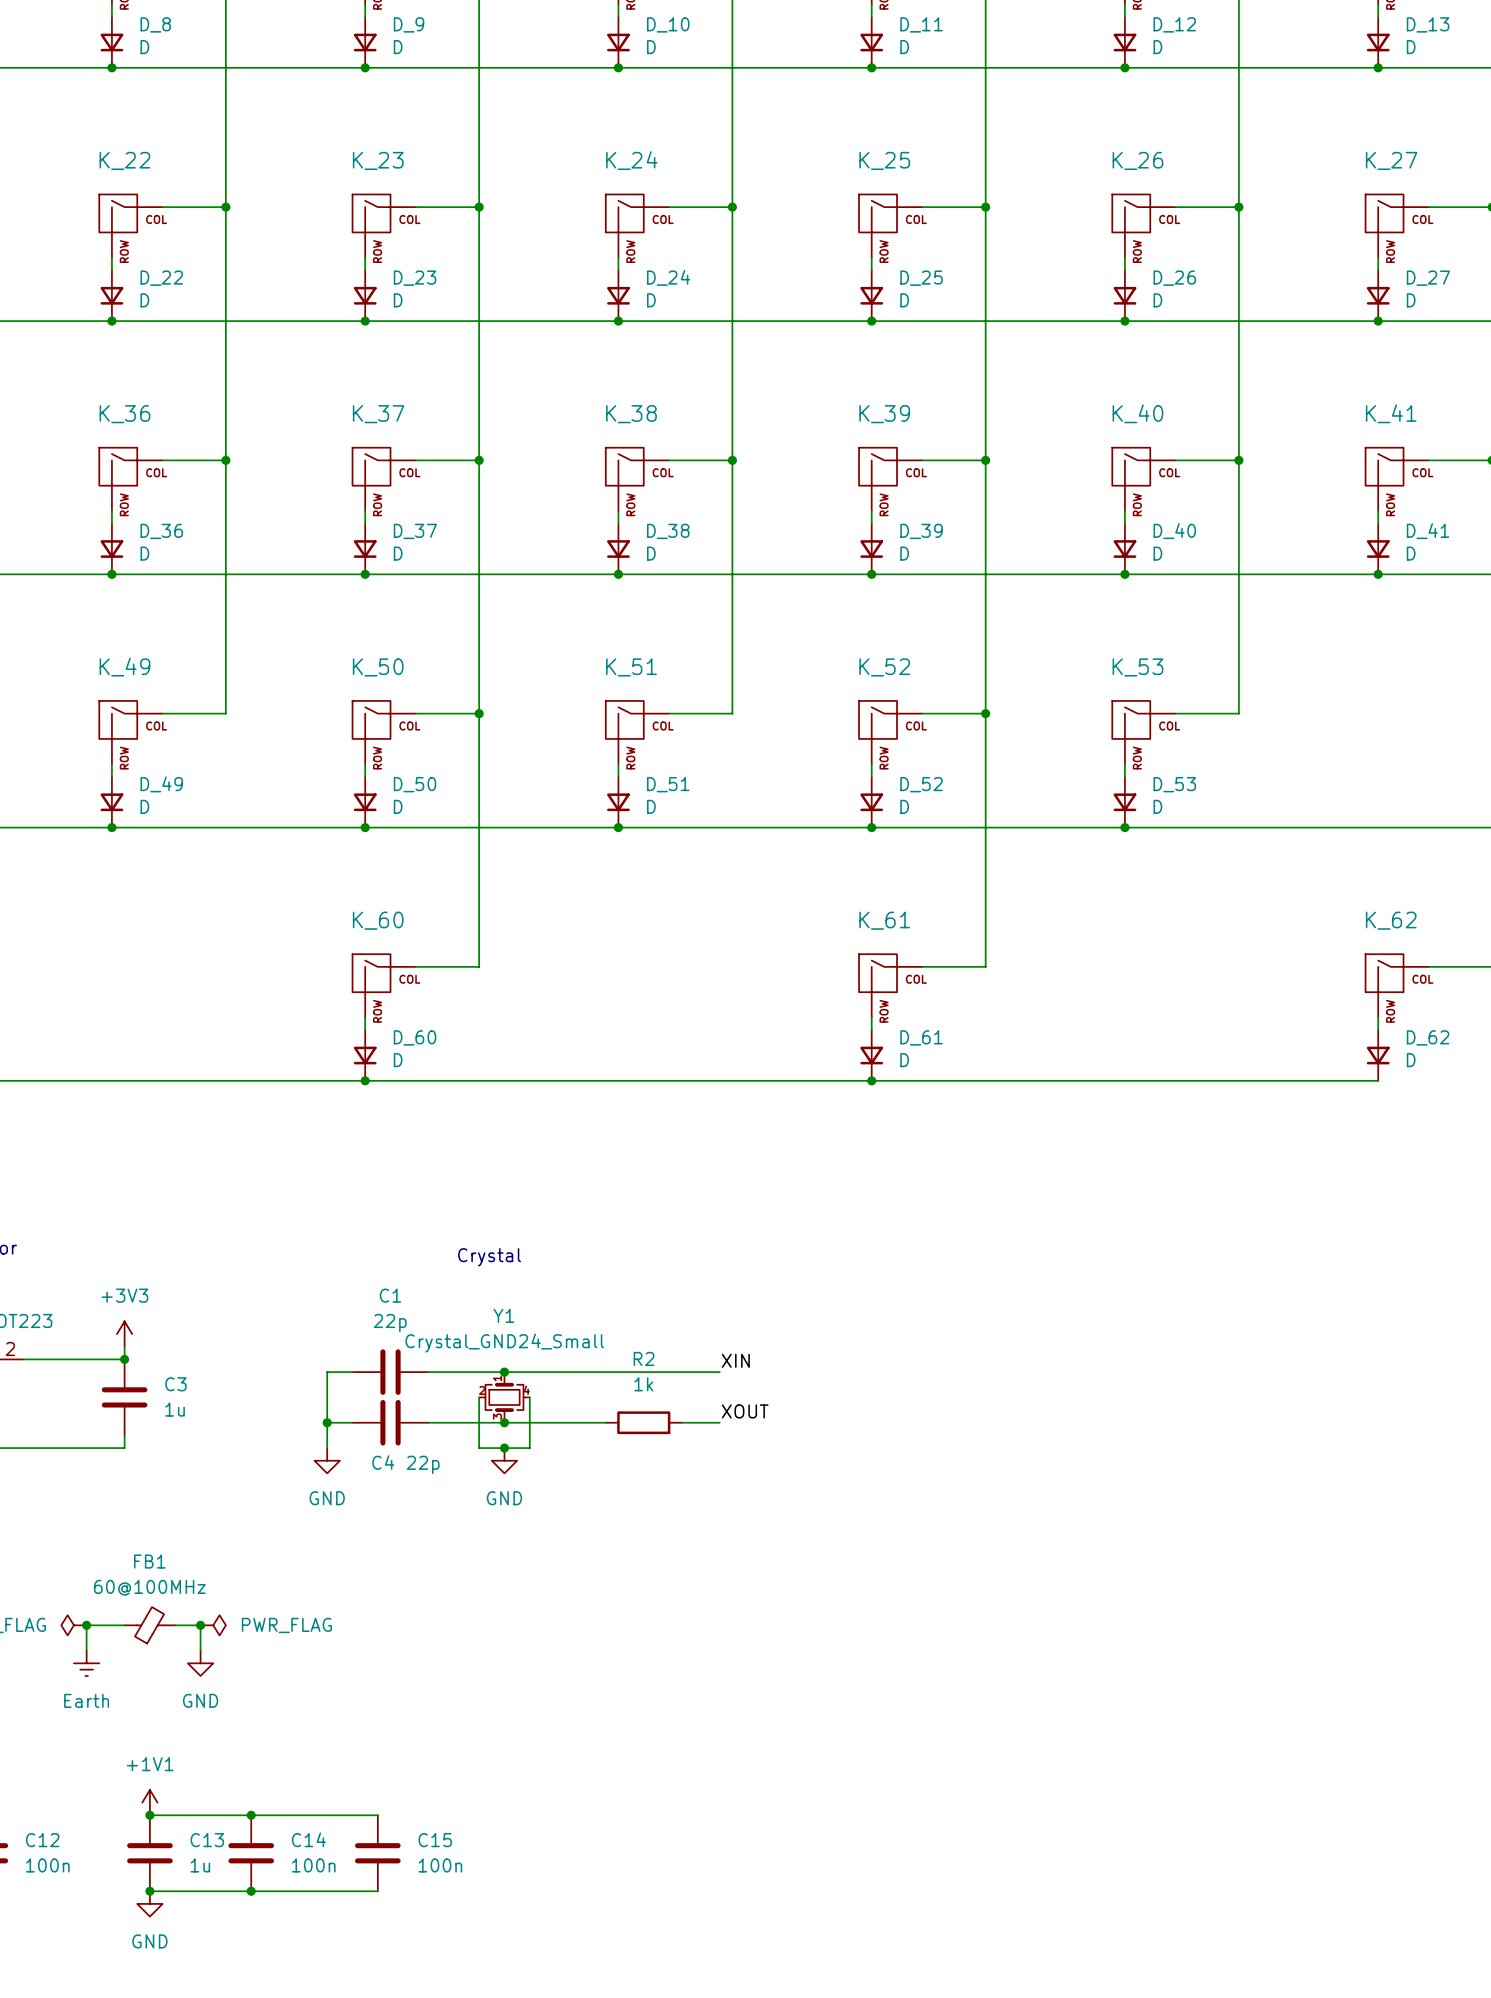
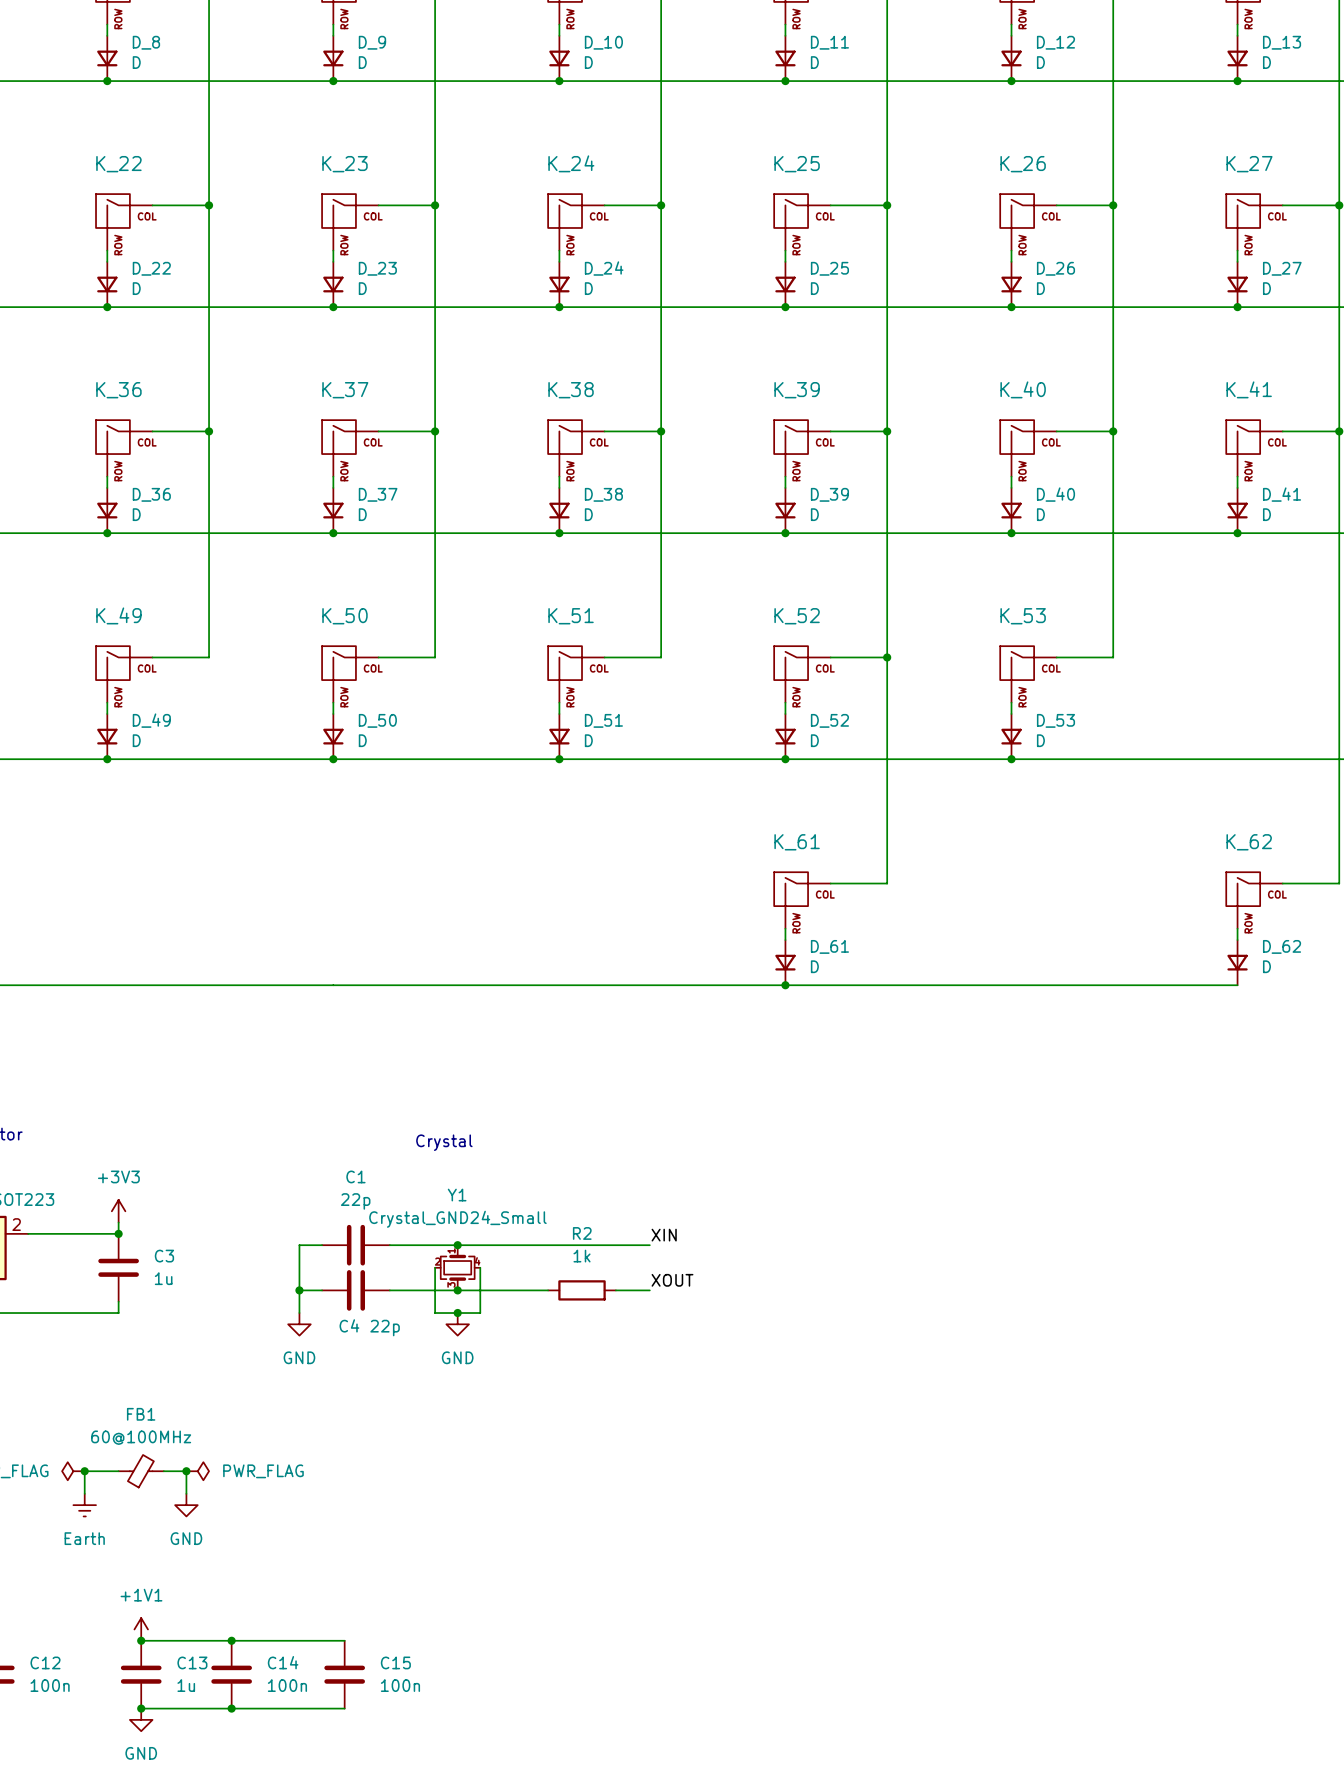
wire: (479, 713) (479, 966) (415, 966) -> none
junction: (479, 713) -> none
K_60: (384, 985) -> none
wire: (365, 1017) (365, 1030) -> none
D_60: D (365, 1055) -> none
junction: (365, 1080) -> none

